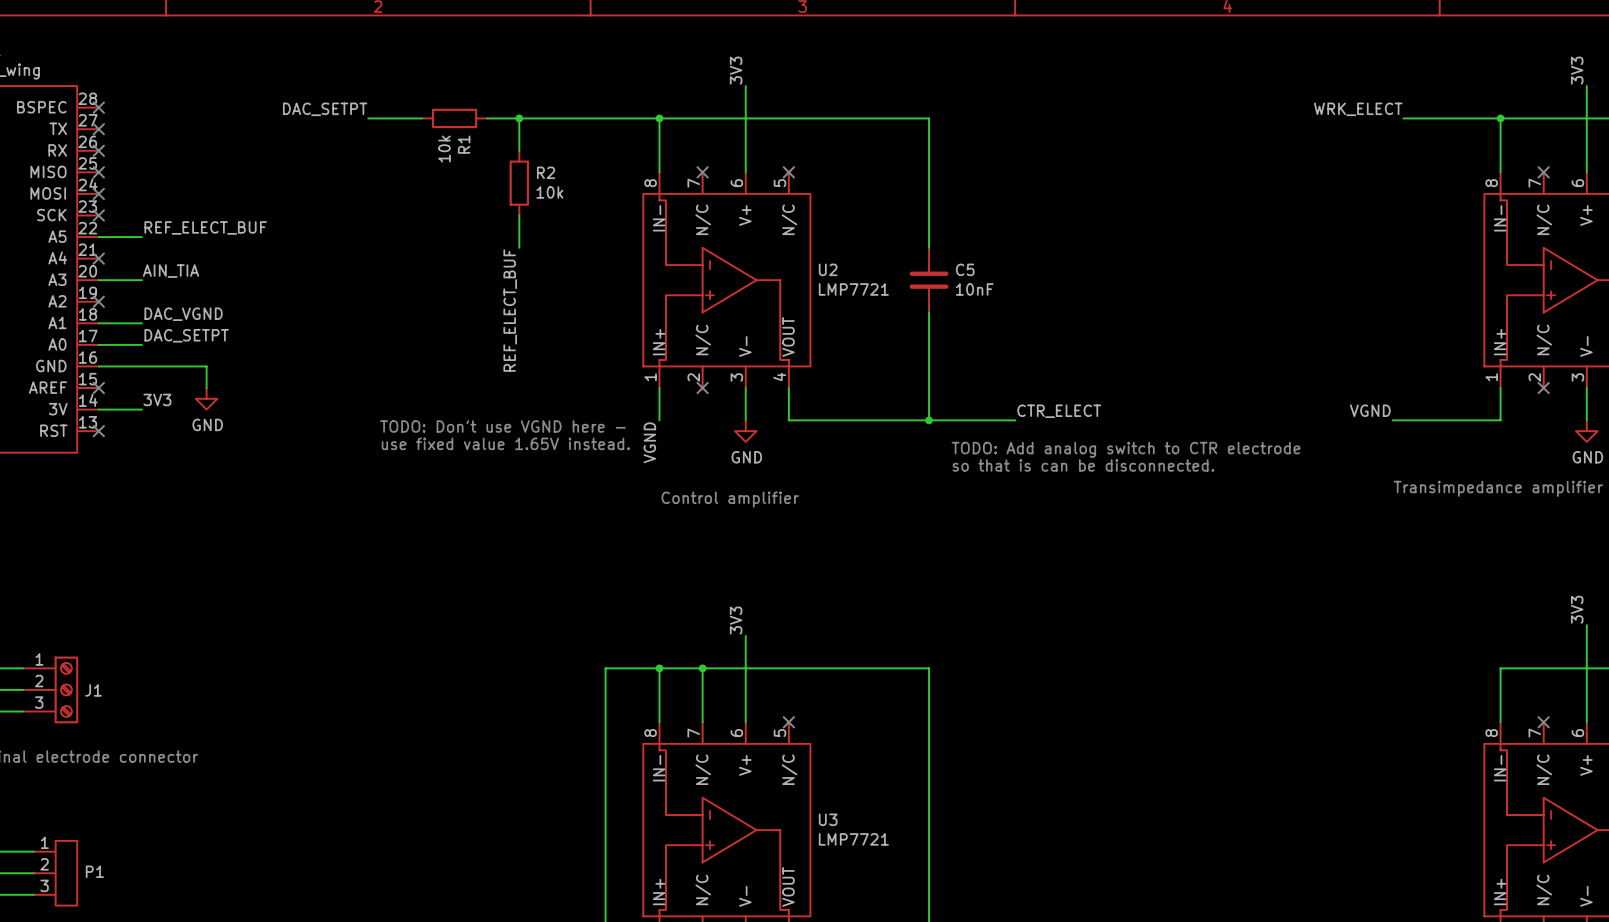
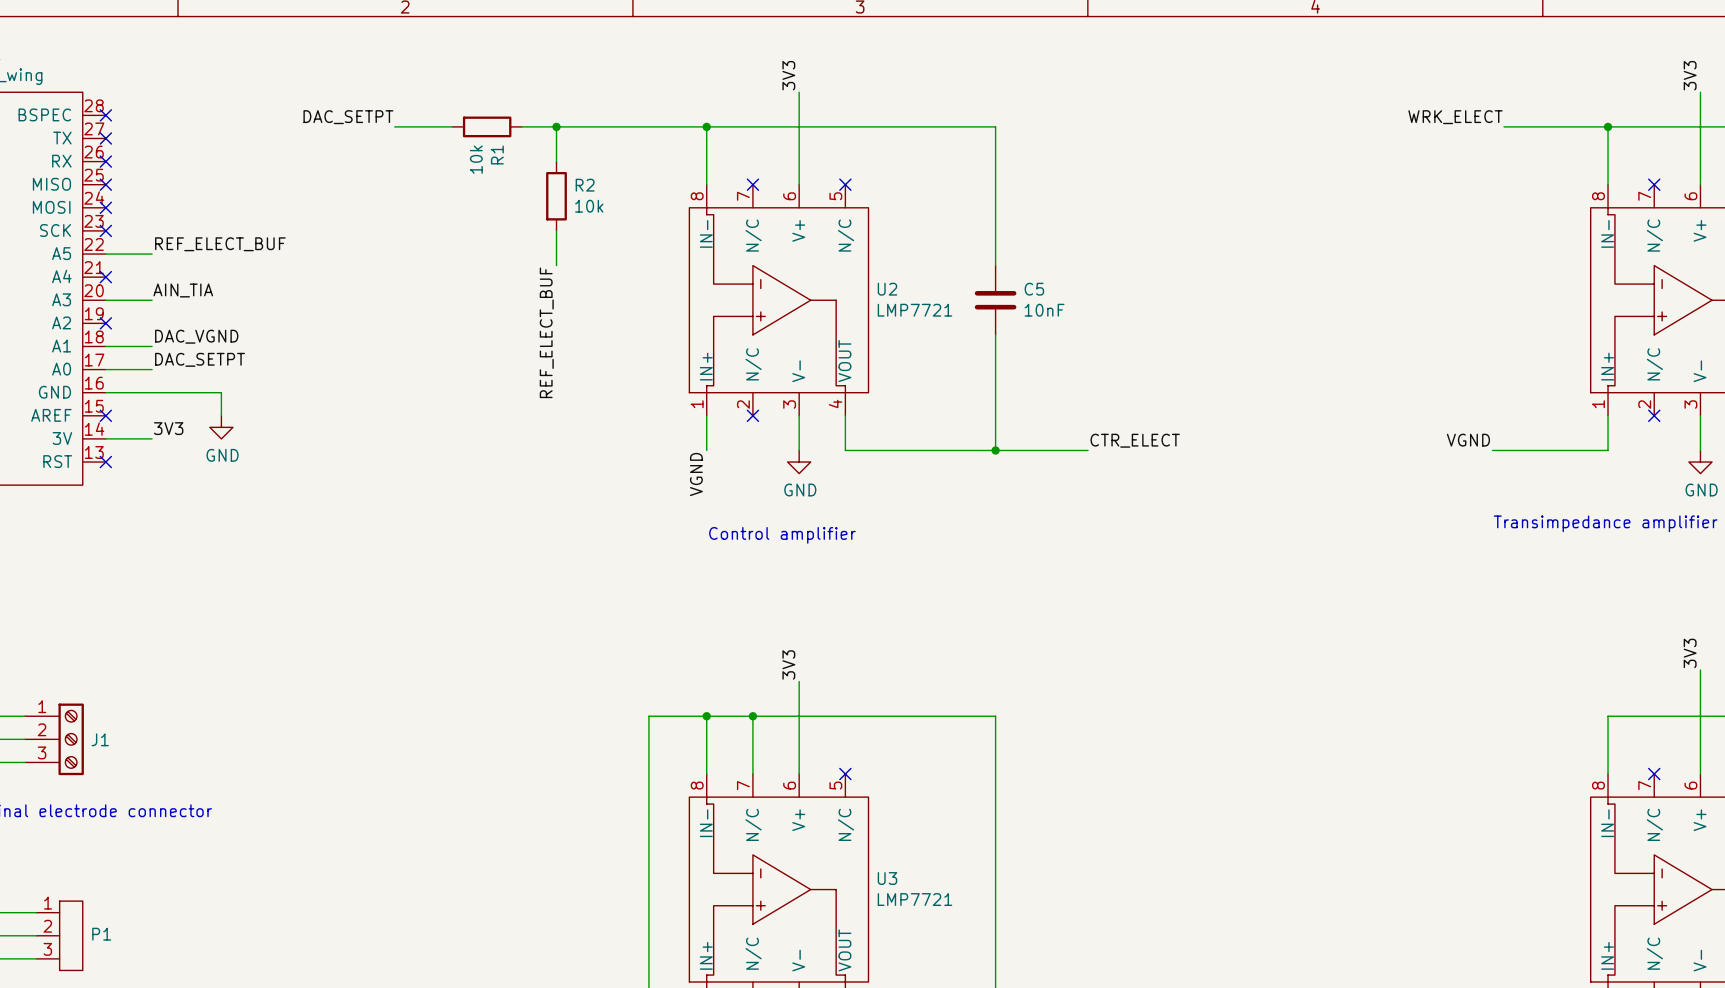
text: TODO: Don't use VGND here - (502, 426) -> none
text: use fixed value 1.65V instead. (505, 443) -> none
text: TODO: Add analog switch to CTR electrode (1126, 449) -> none
text: so that is can be disconnected. (1083, 465) -> none

